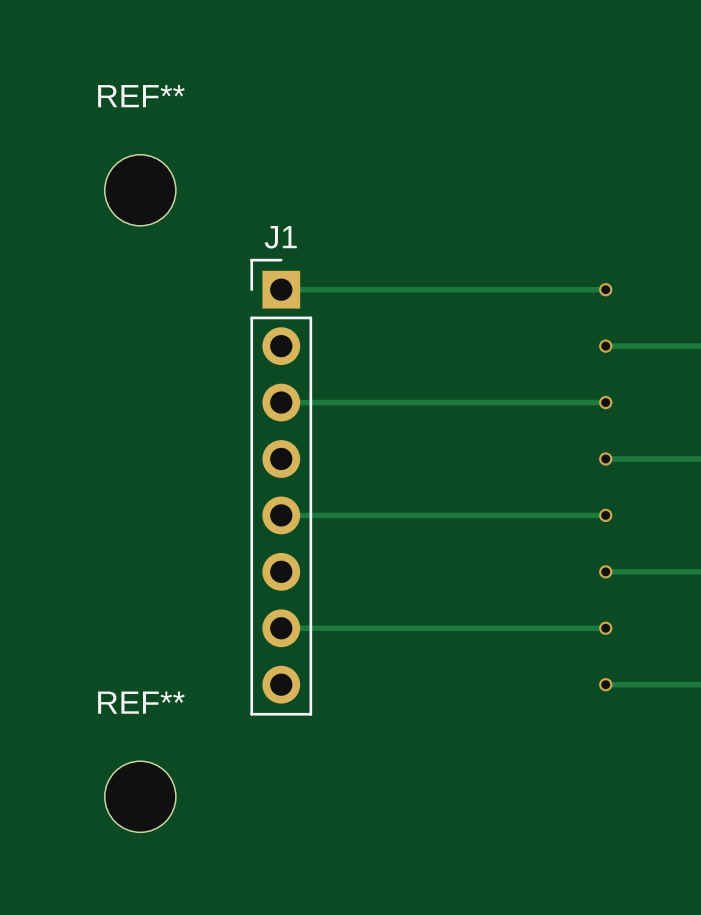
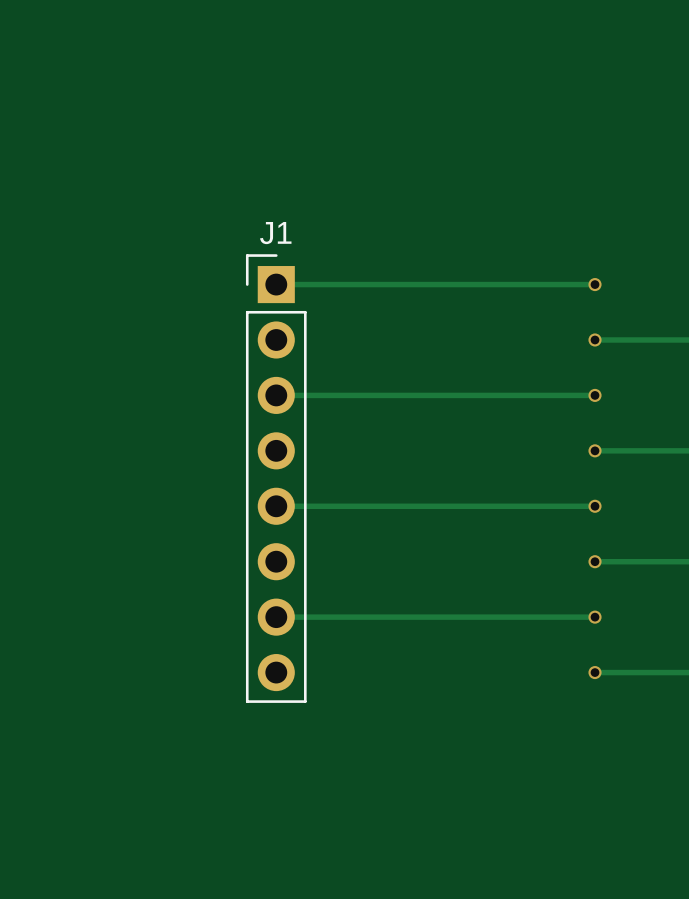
REF**: (140, 190) -> none
REF**: (140, 796) -> none

